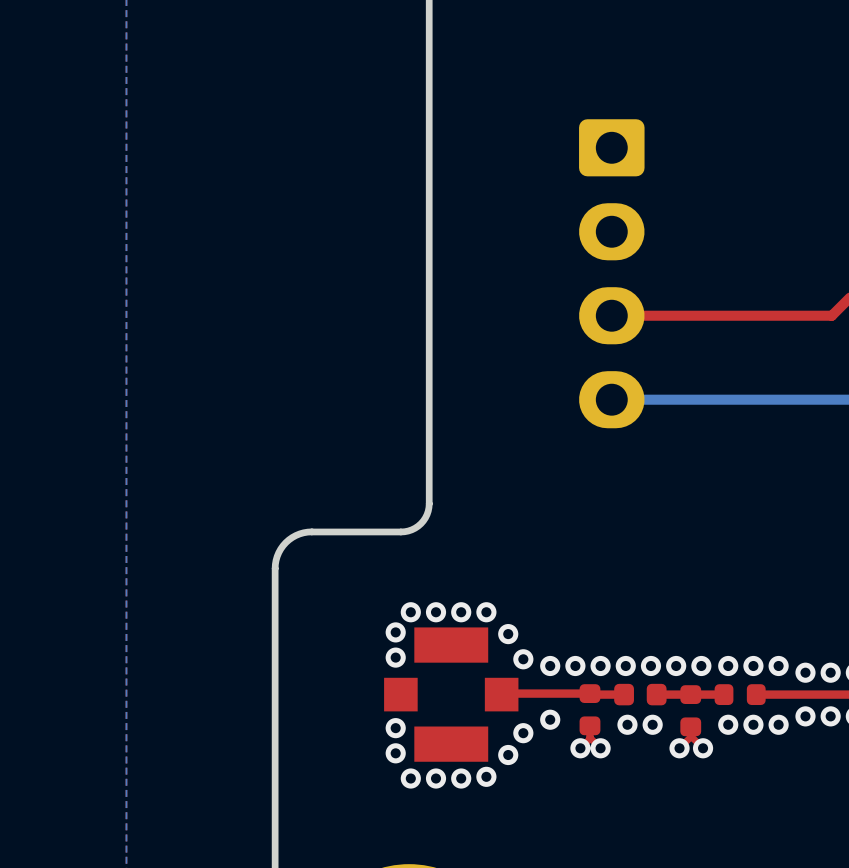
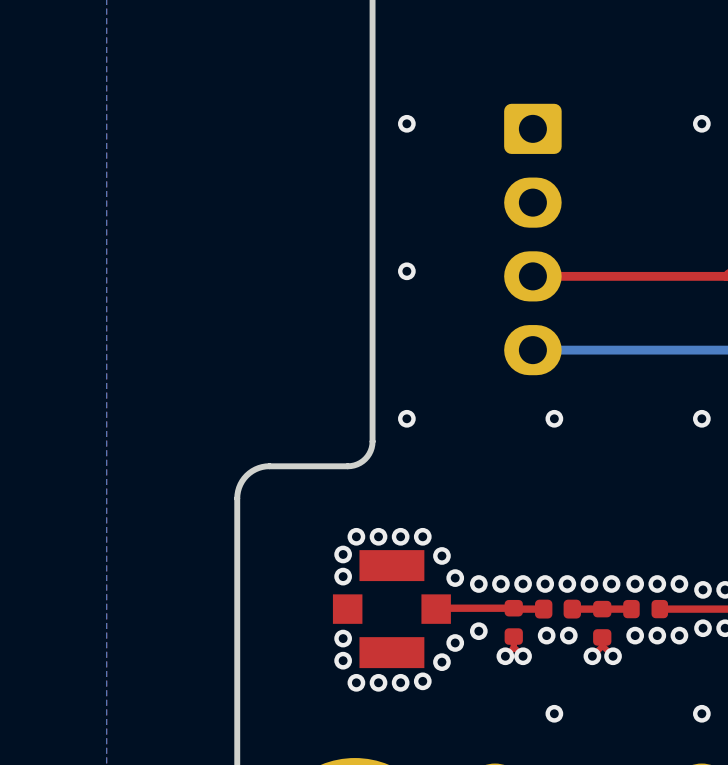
via: none -> (406, 123)
via: none -> (701, 123)
via: none -> (406, 271)
via: none -> (406, 418)
via: none -> (554, 418)
via: none -> (701, 418)
via: none -> (554, 713)
via: none -> (701, 713)

